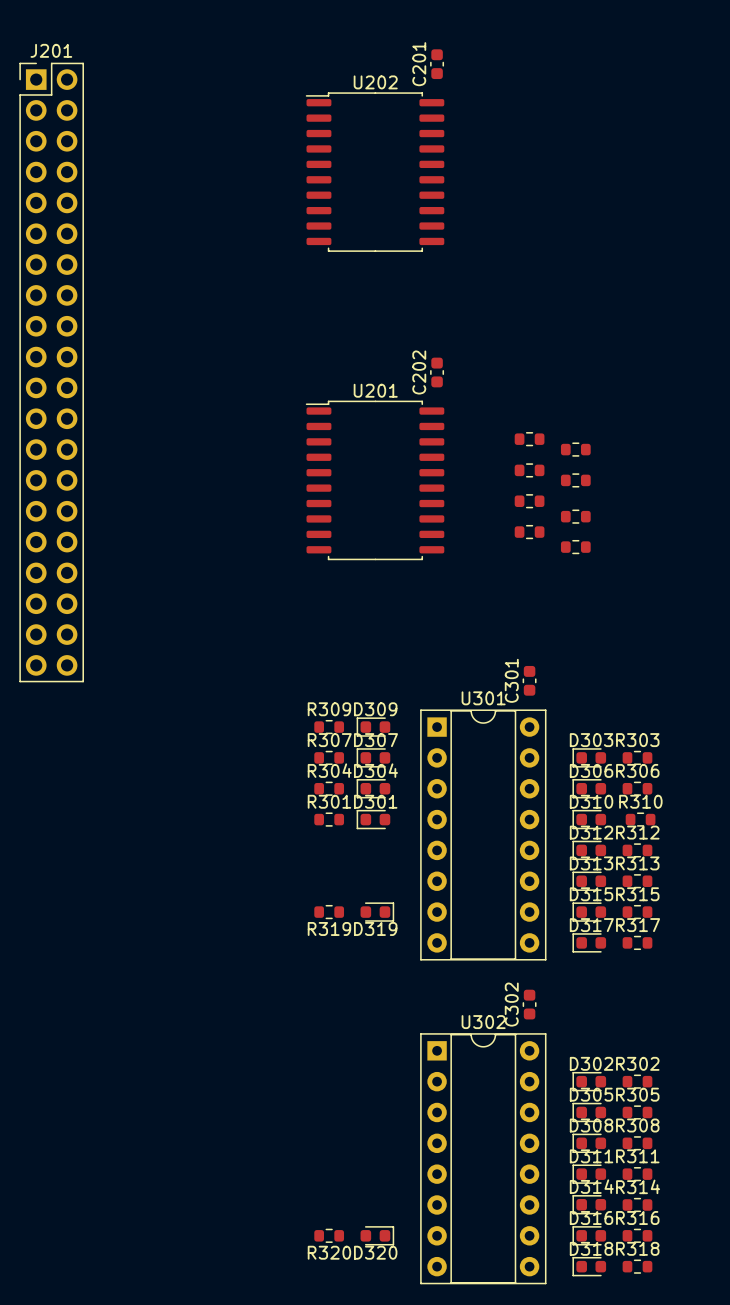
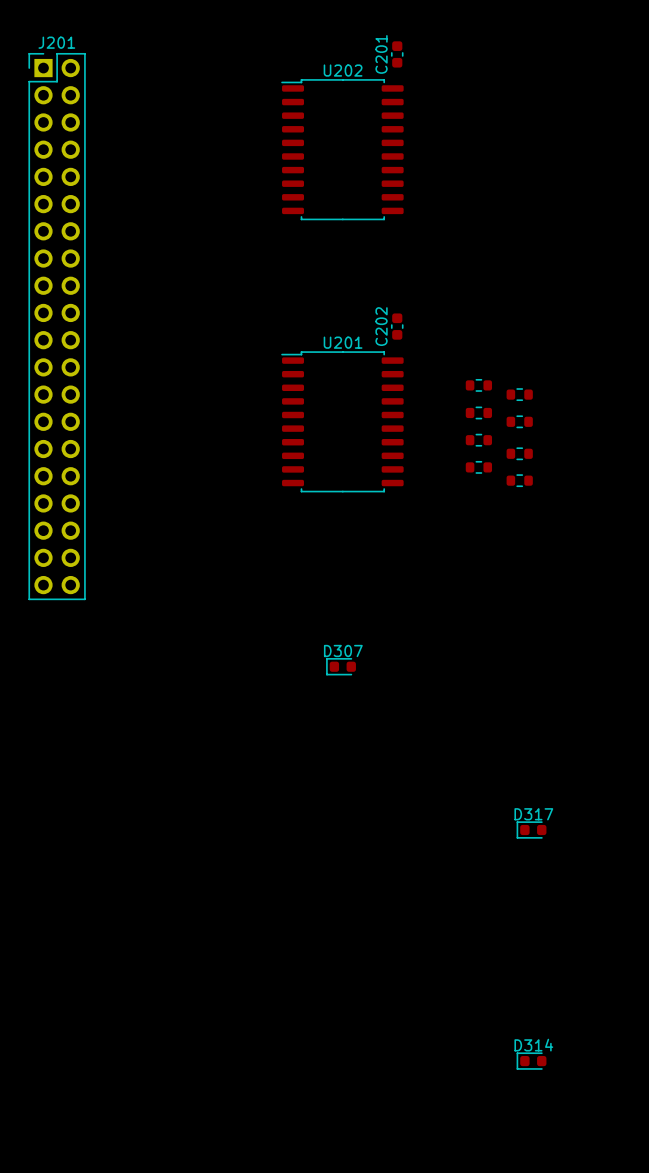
C301: (529, 680) -> none
R309: (329, 727) -> none
D309: (373, 727) -> none
R307: (329, 757) -> none
D303: (589, 757) -> none
R303: (637, 757) -> none
R304: (329, 788) -> none
D304: (373, 788) -> none
D306: (589, 788) -> none
R306: (637, 788) -> none
R301: (329, 819) -> none
D301: (373, 819) -> none
D310: (589, 819) -> none
R310: (640, 819) -> none
U301: (483, 834) -> none
D312: (589, 850) -> none
R312: (637, 850) -> none
D313: (589, 881) -> none
R313: (637, 881) -> none
R319: (329, 912) -> none
D319: (377, 912) -> none
D315: (589, 912) -> none
R315: (637, 912) -> none
R317: (637, 942) -> none
C302: (529, 1004) -> none
D302: (589, 1081) -> none
R302: (637, 1081) -> none
D305: (589, 1112) -> none
R305: (637, 1112) -> none
D308: (589, 1143) -> none
R308: (637, 1143) -> none
U302: (483, 1158) -> none
D311: (589, 1174) -> none
R311: (637, 1174) -> none
R314: (637, 1204) -> none
R320: (329, 1235) -> none
D320: (377, 1235) -> none
D316: (589, 1235) -> none
R316: (637, 1235) -> none
D318: (589, 1266) -> none
R318: (637, 1266) -> none

